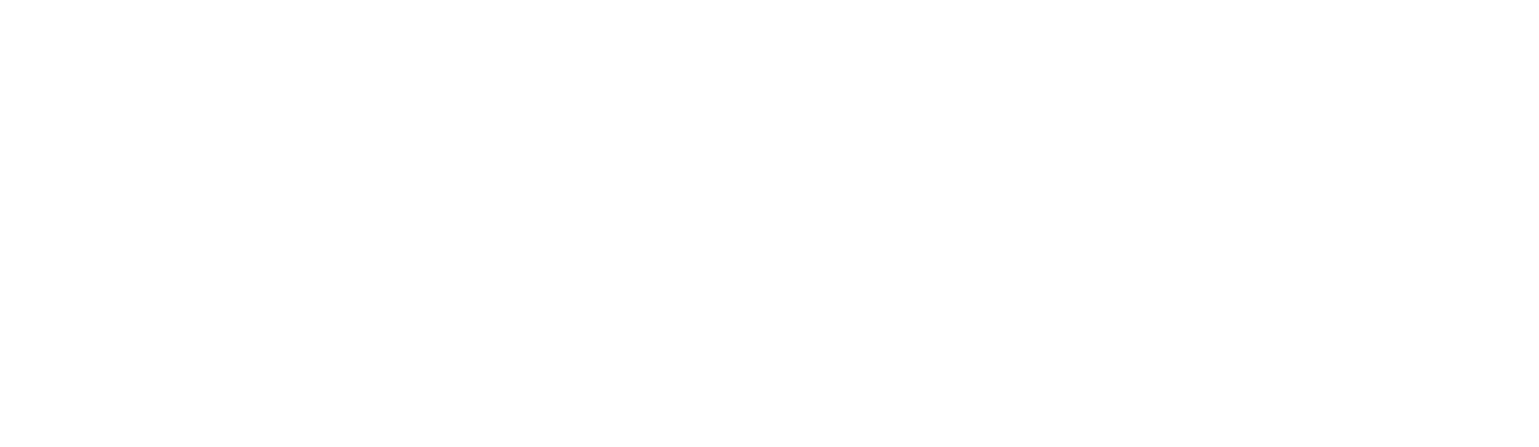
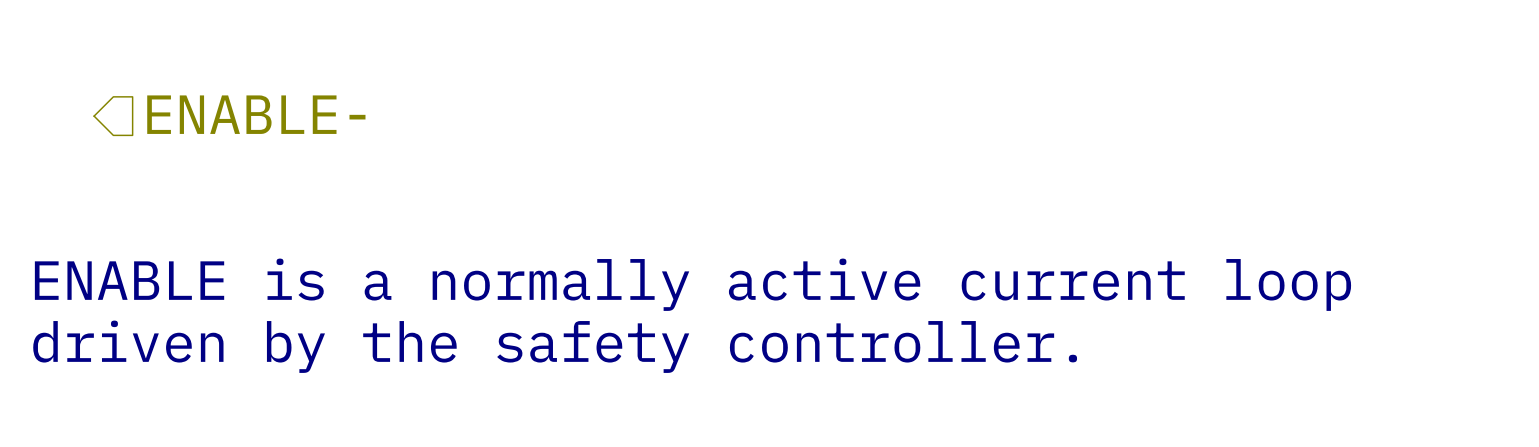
hierarchical label: none -> ENABLE- (256, 114)
text: none -> ENABLE is a normally active current loop (692, 284)
text: none -> driven by the safety controller. (555, 346)

